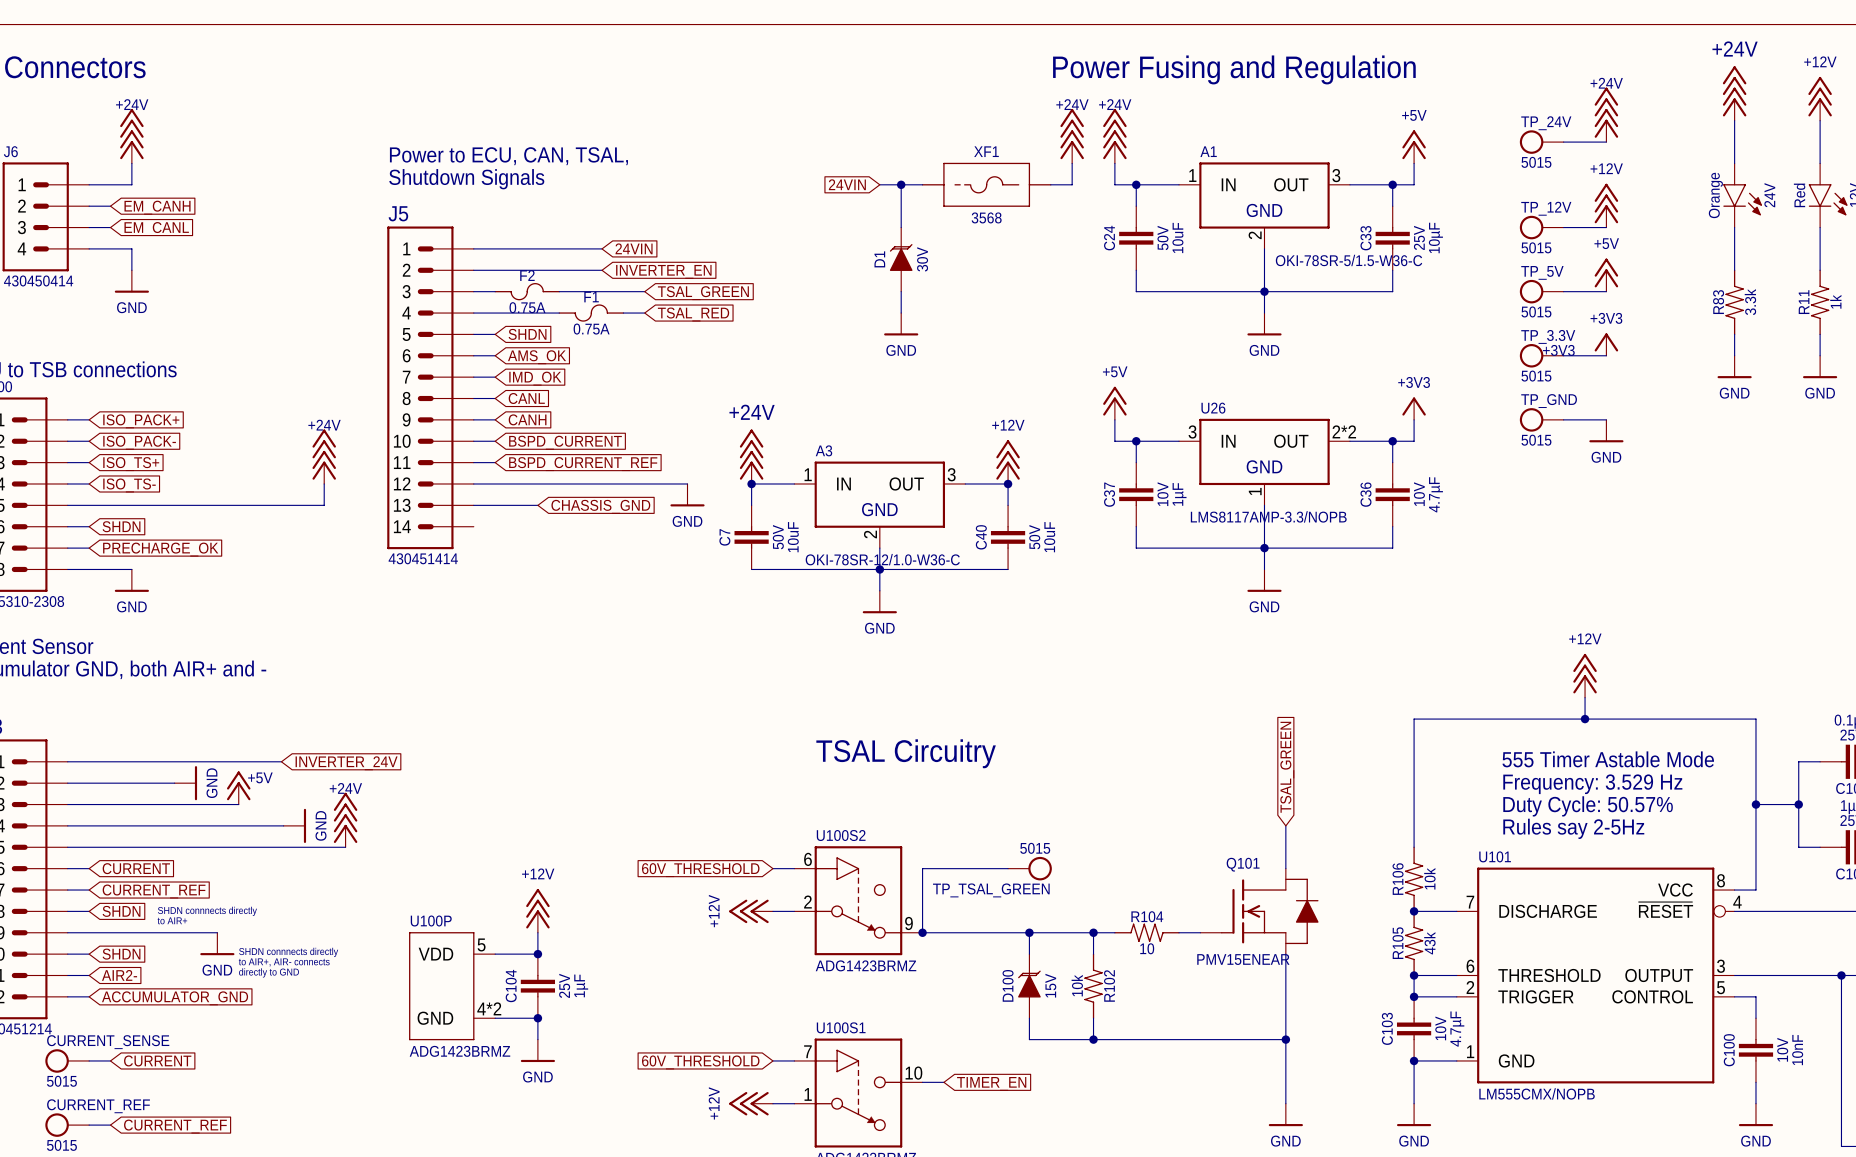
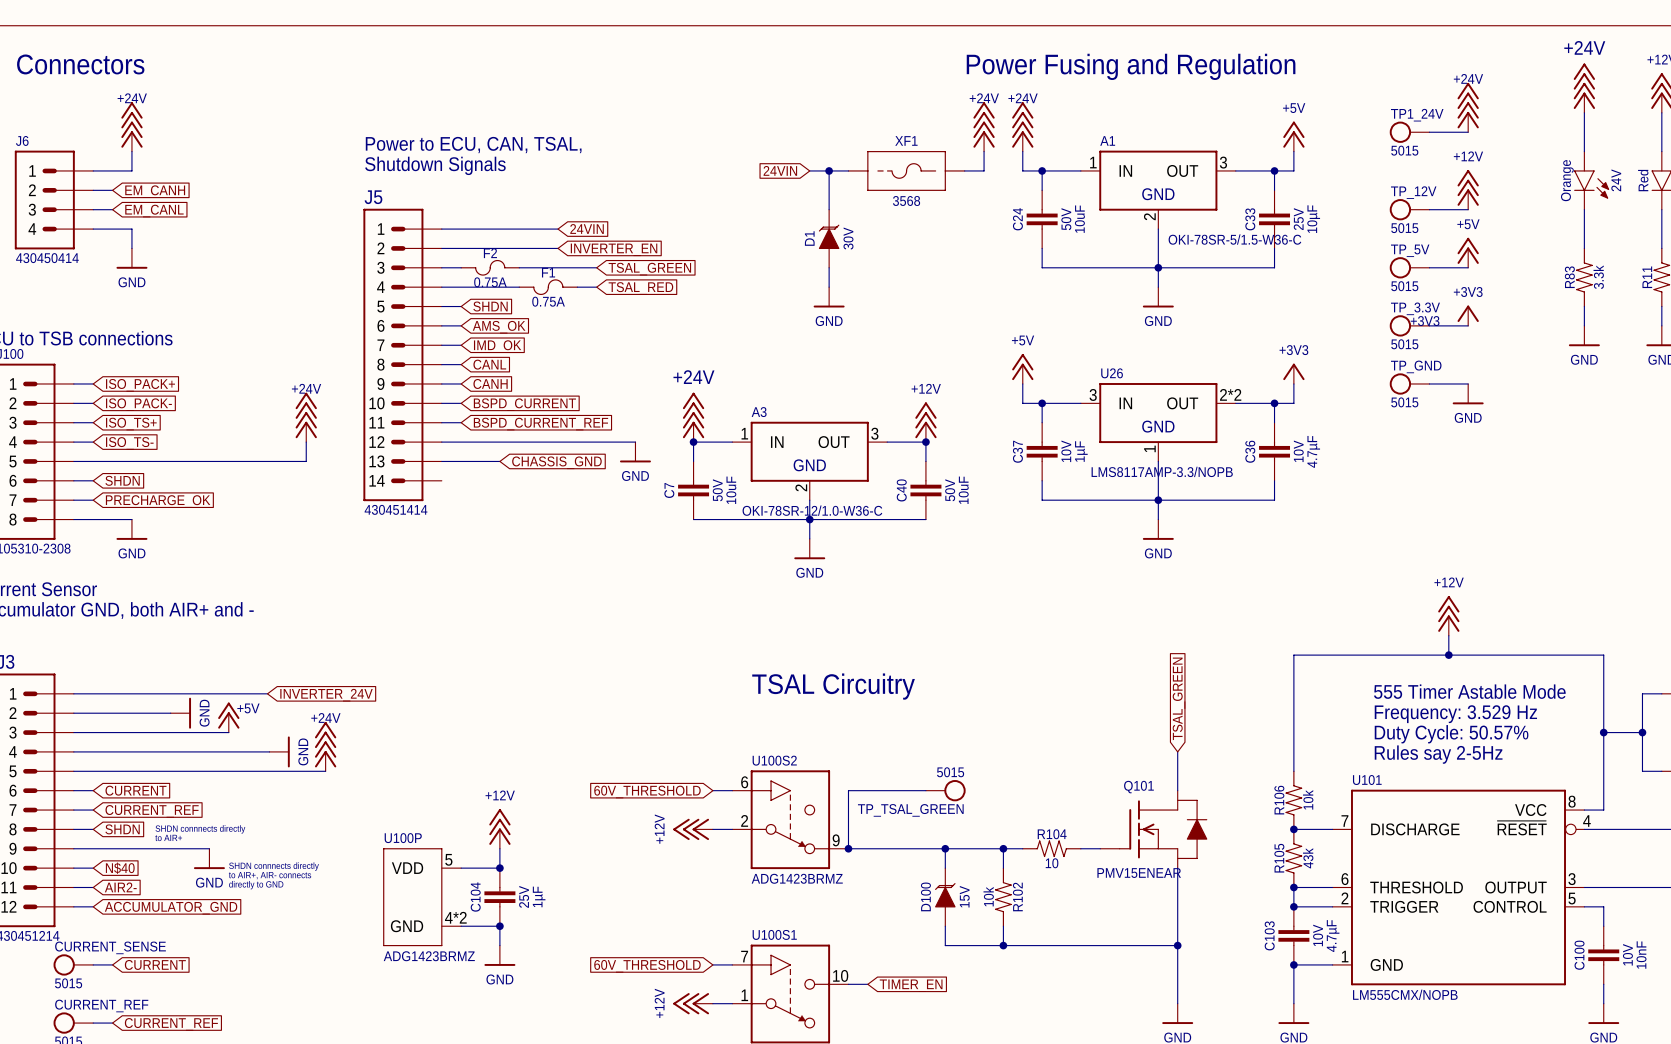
TP_24V name: TP_24V (1546, 123) -> TP1_24V (1417, 115)
global label: SHDN (121, 954) -> N$40 (120, 868)

